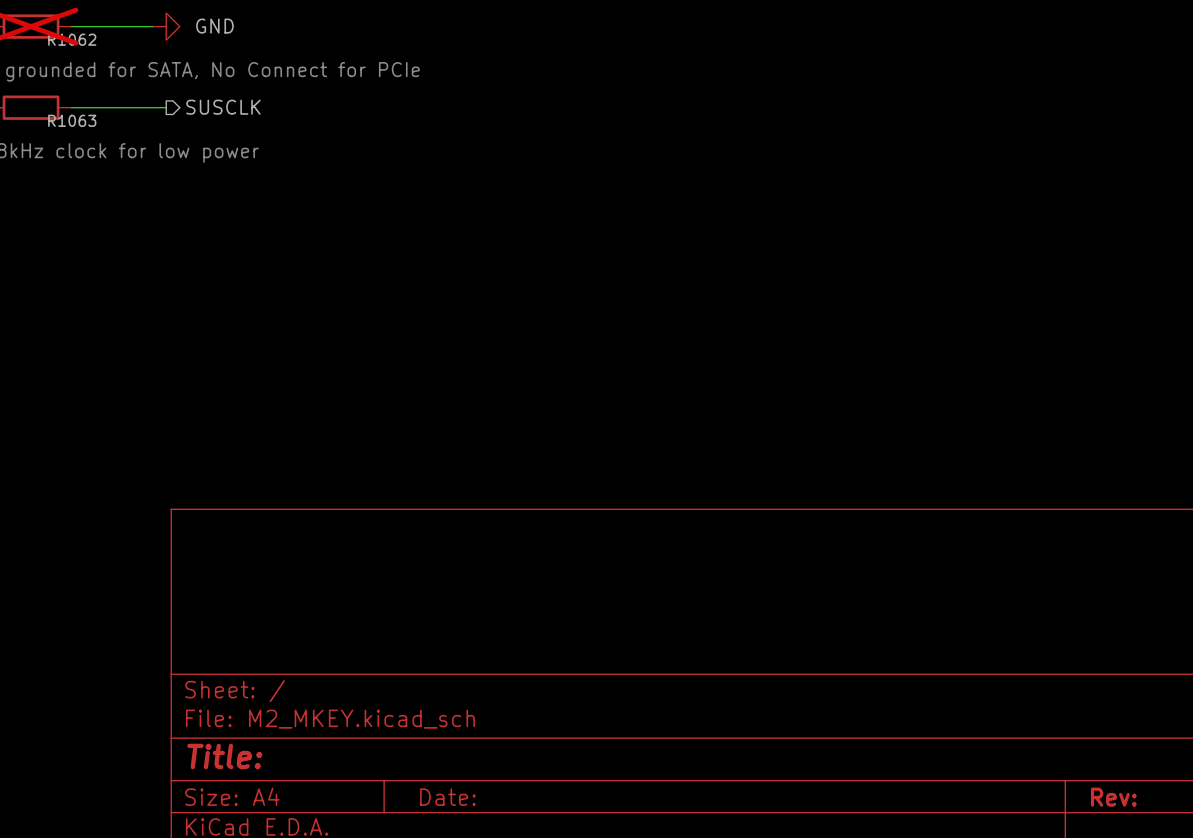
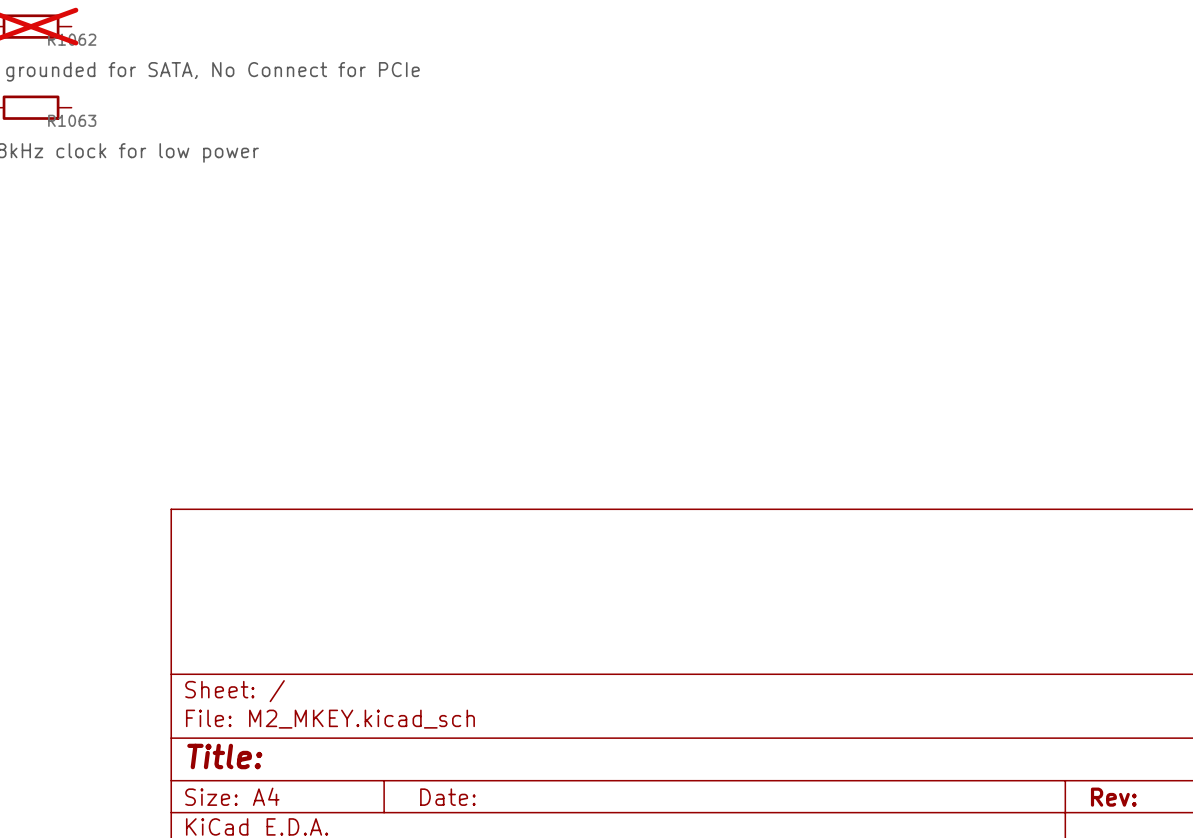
wire: (71, 26) (152, 26) -> none
power symbol: GND (166, 26) -> none
wire: (71, 107) (166, 107) -> none
hierarchical label: SUSCLK (223, 107) -> none

